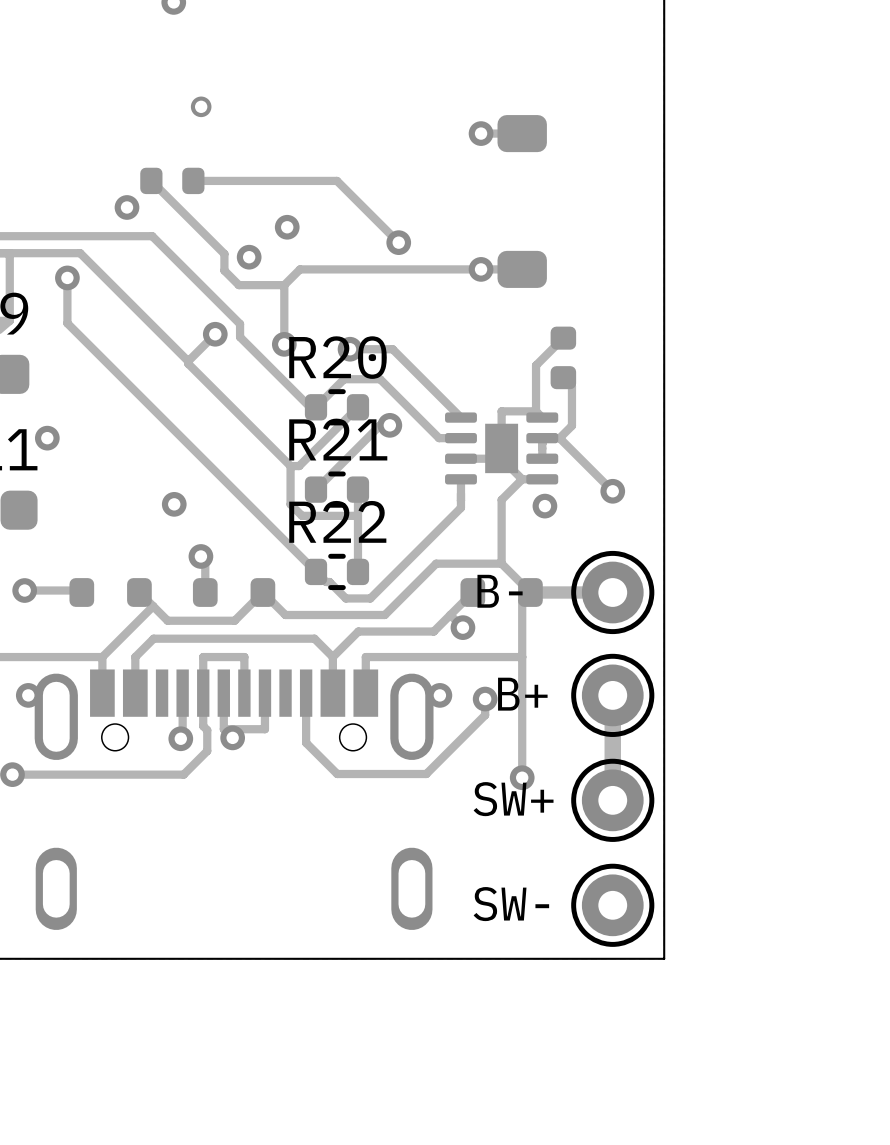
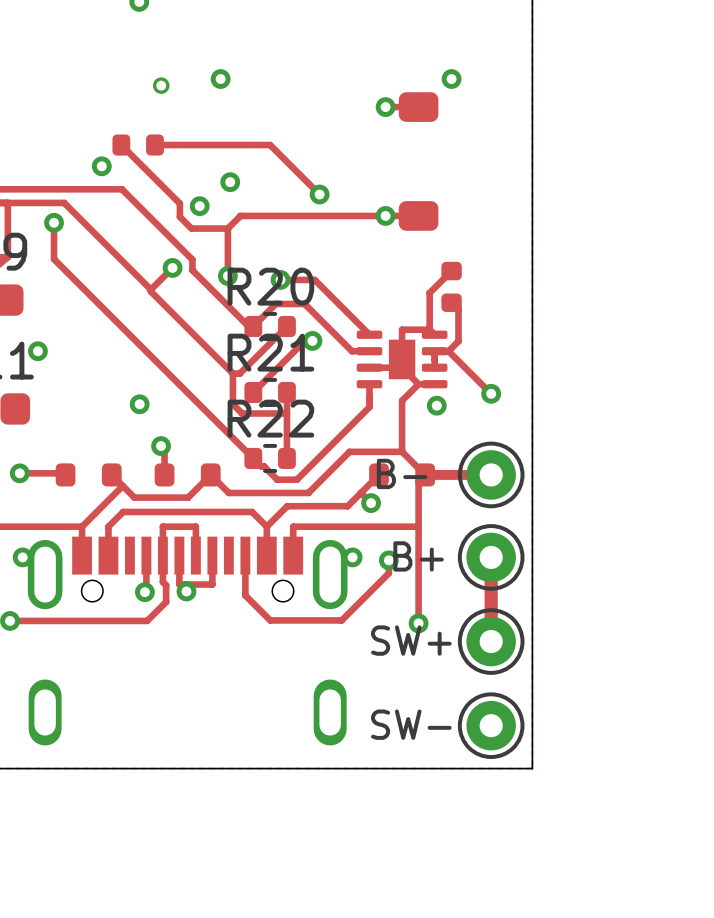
via: none -> (220, 79)
via: none -> (451, 79)

